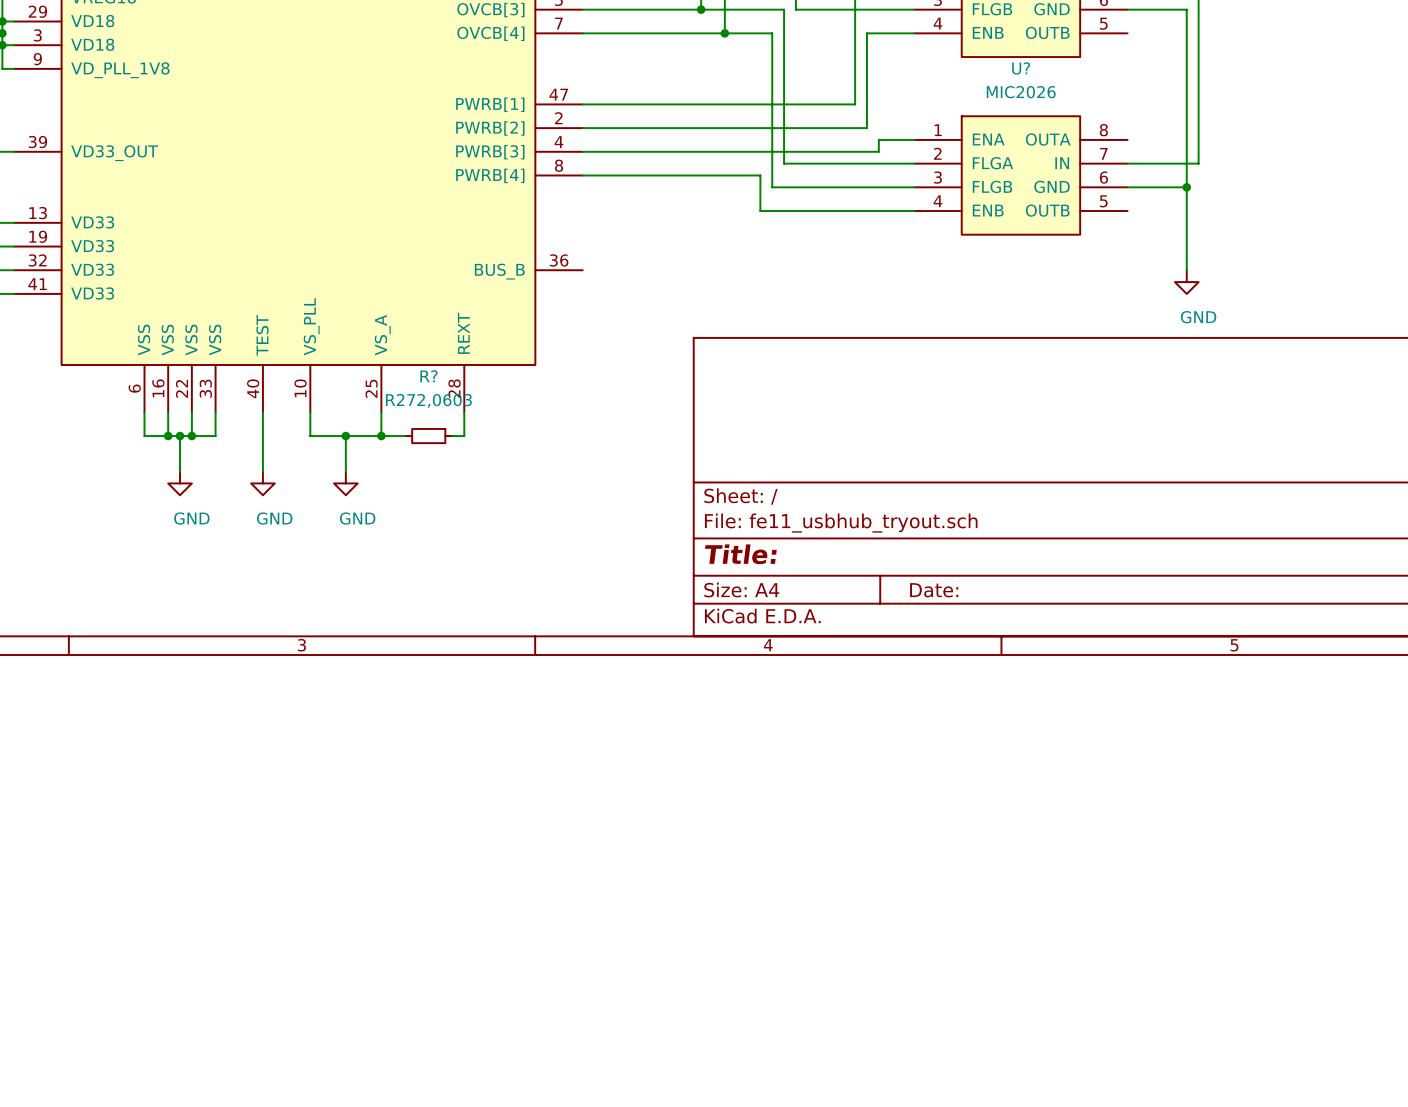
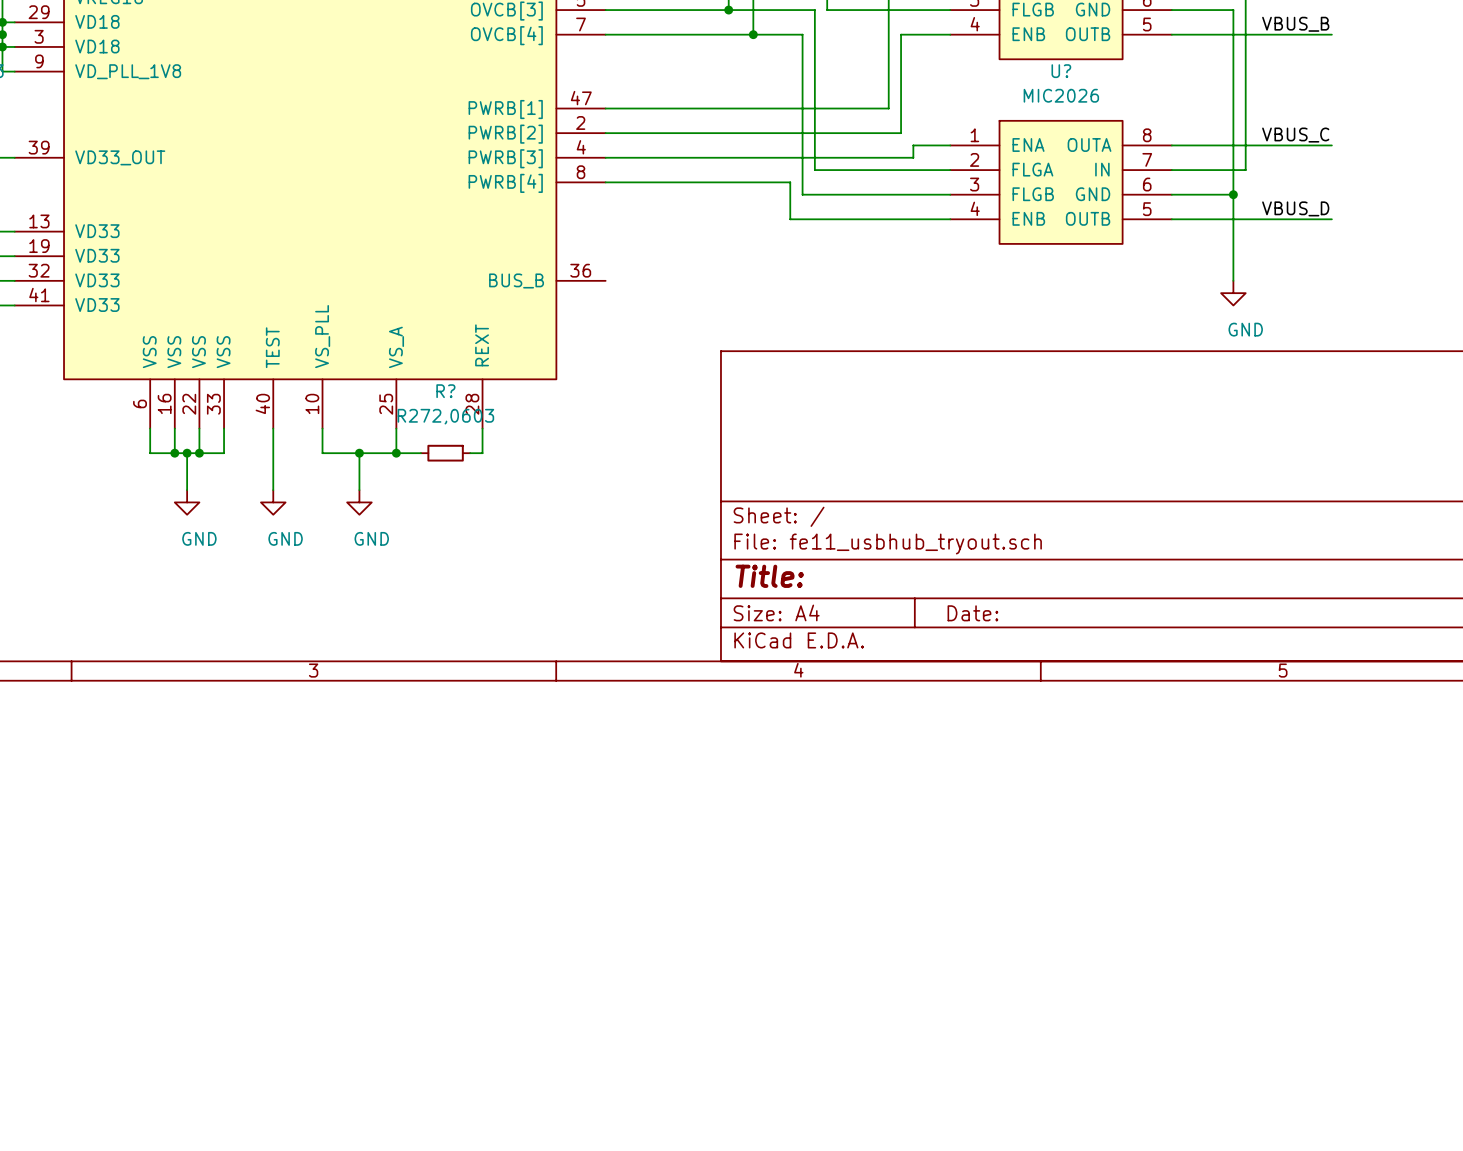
label: none -> VBUS_B (1295, 24)
wire: none -> (1171, 34) (1331, 34)
label: none -> VBUS_C (1295, 135)
wire: none -> (1171, 145) (1331, 145)
label: none -> VBUS_D (1295, 208)
wire: none -> (1171, 219) (1331, 219)

